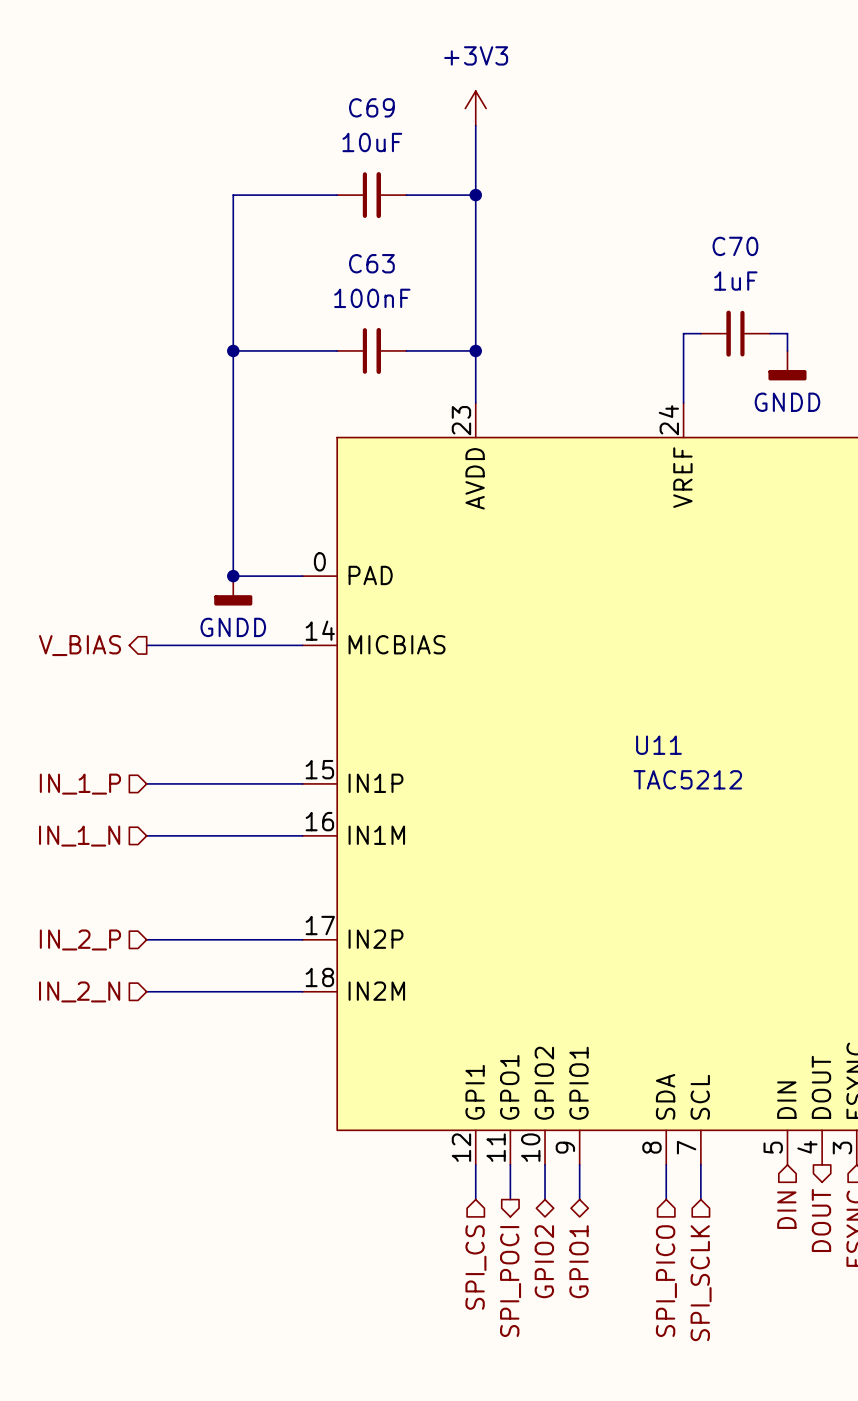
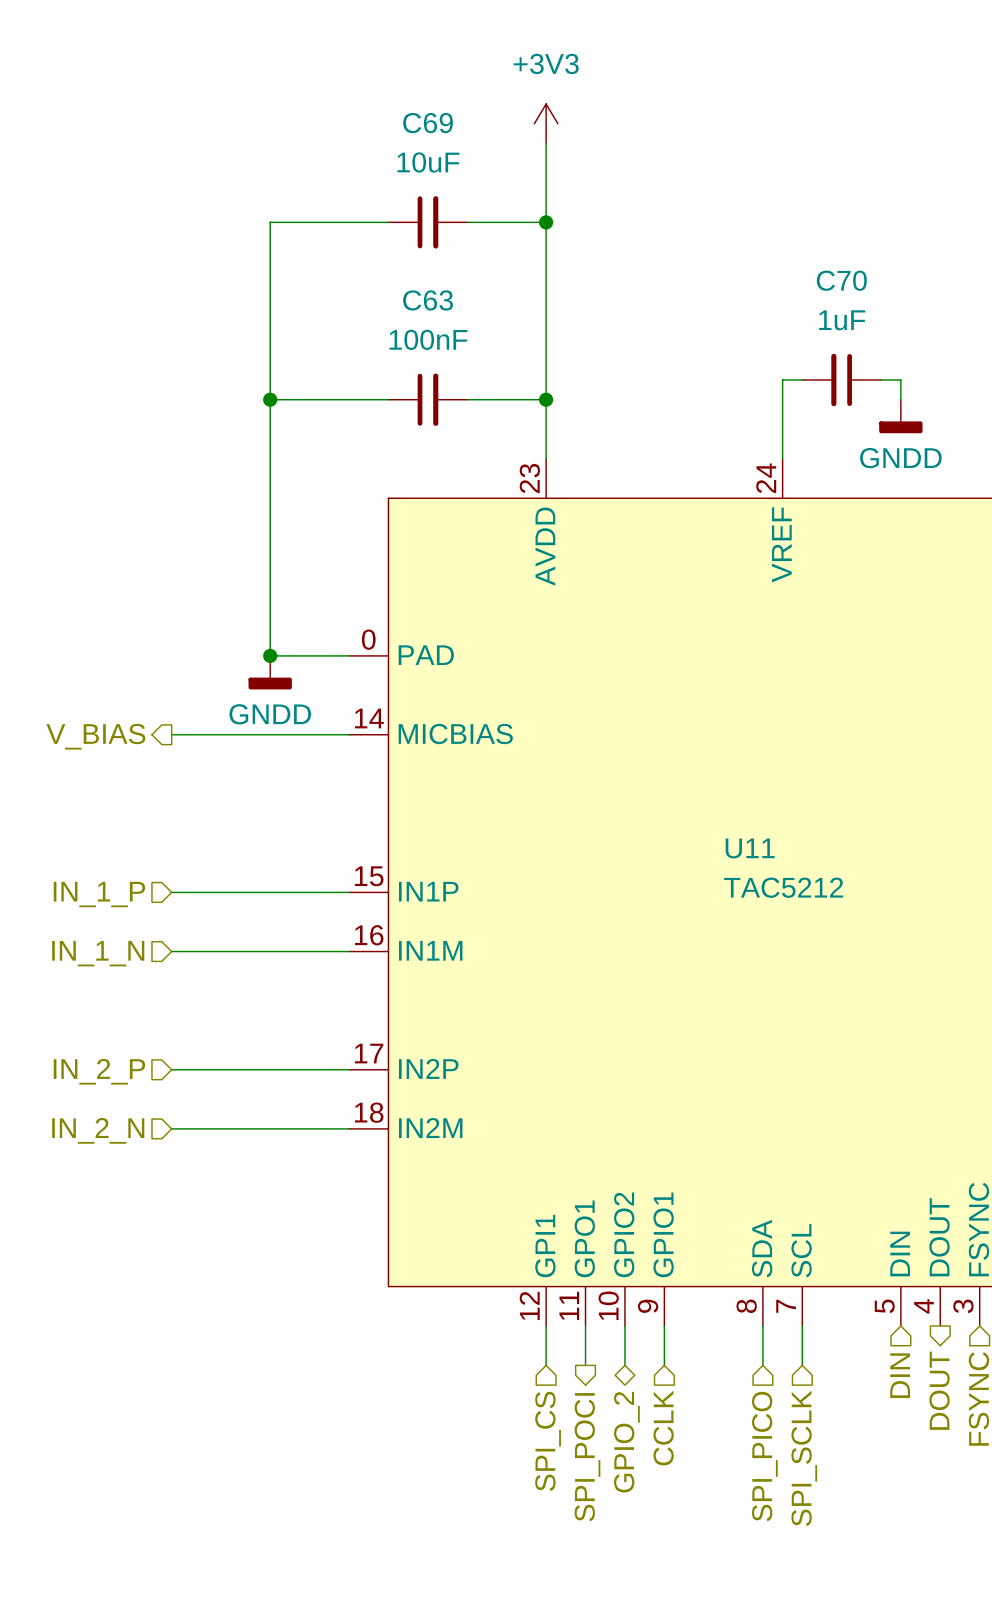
hierarchical label: GPIO2 (544, 1261) -> GPIO_2 (626, 1442)
hierarchical label shape: bidirectional (579, 1261) -> input (663, 1428)
hierarchical label: GPIO1 (579, 1261) -> CCLK (663, 1428)

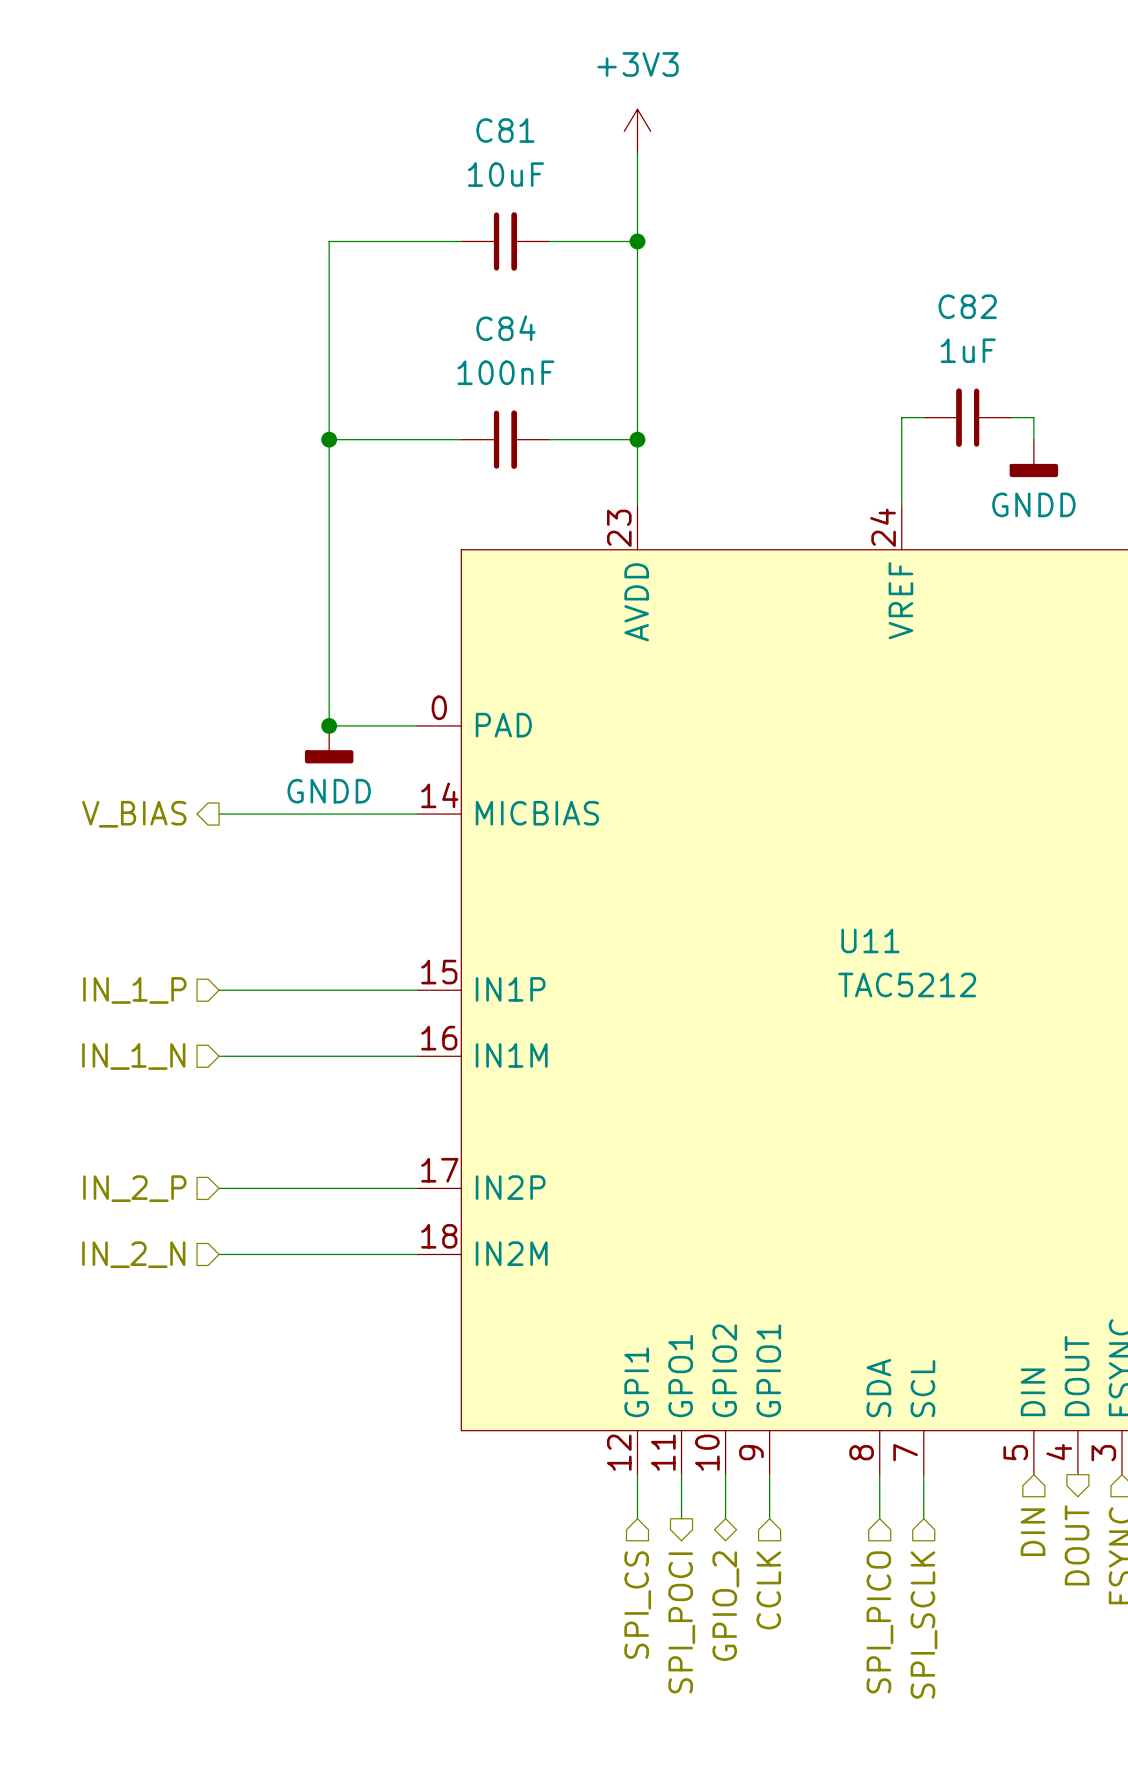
C69 name: C69 (428, 123) -> C81 (505, 130)
C70 name: C70 (841, 280) -> C82 (967, 306)
C63 name: C63 (428, 300) -> C84 (505, 328)

